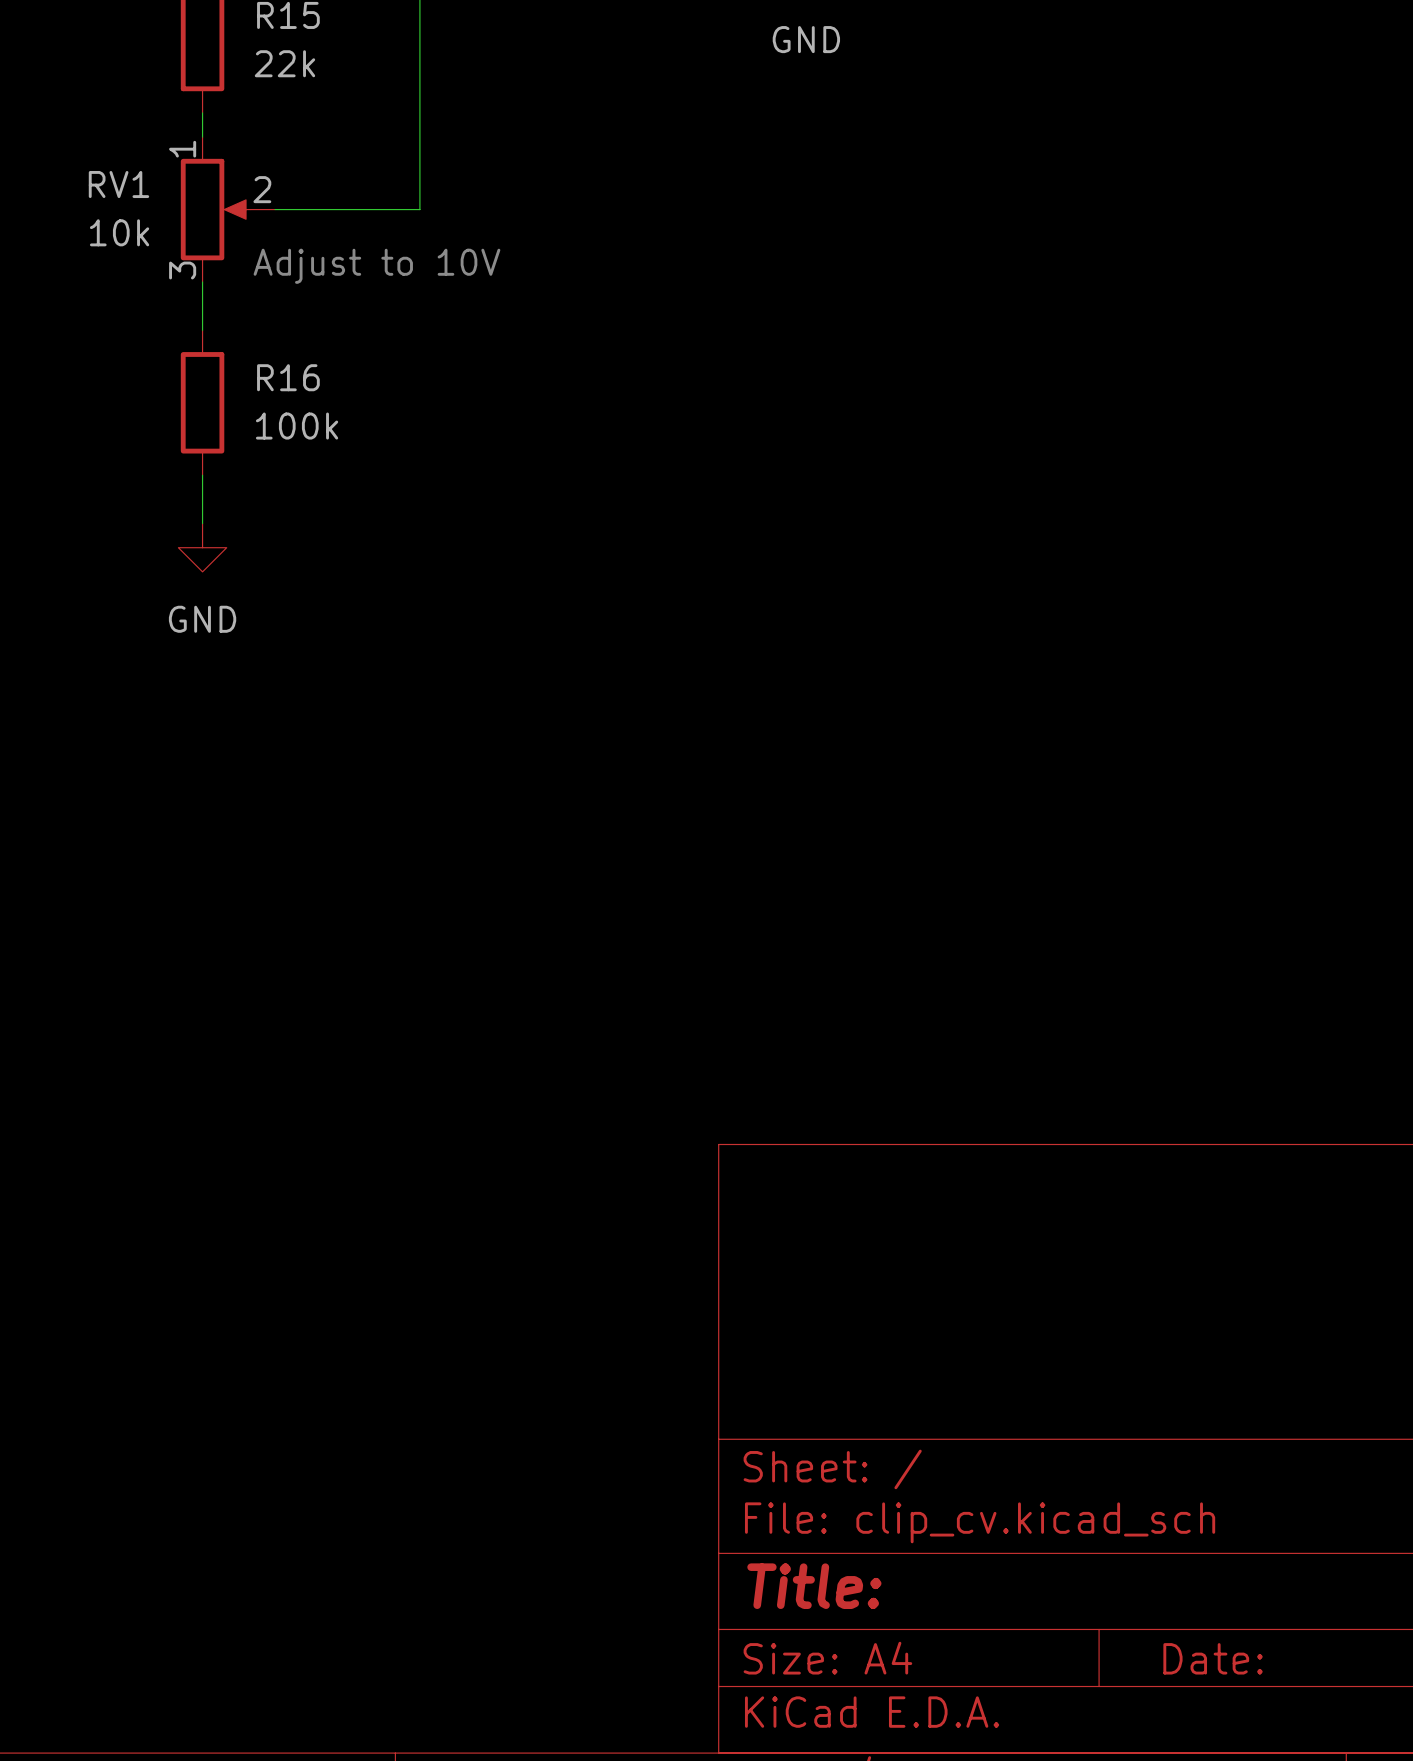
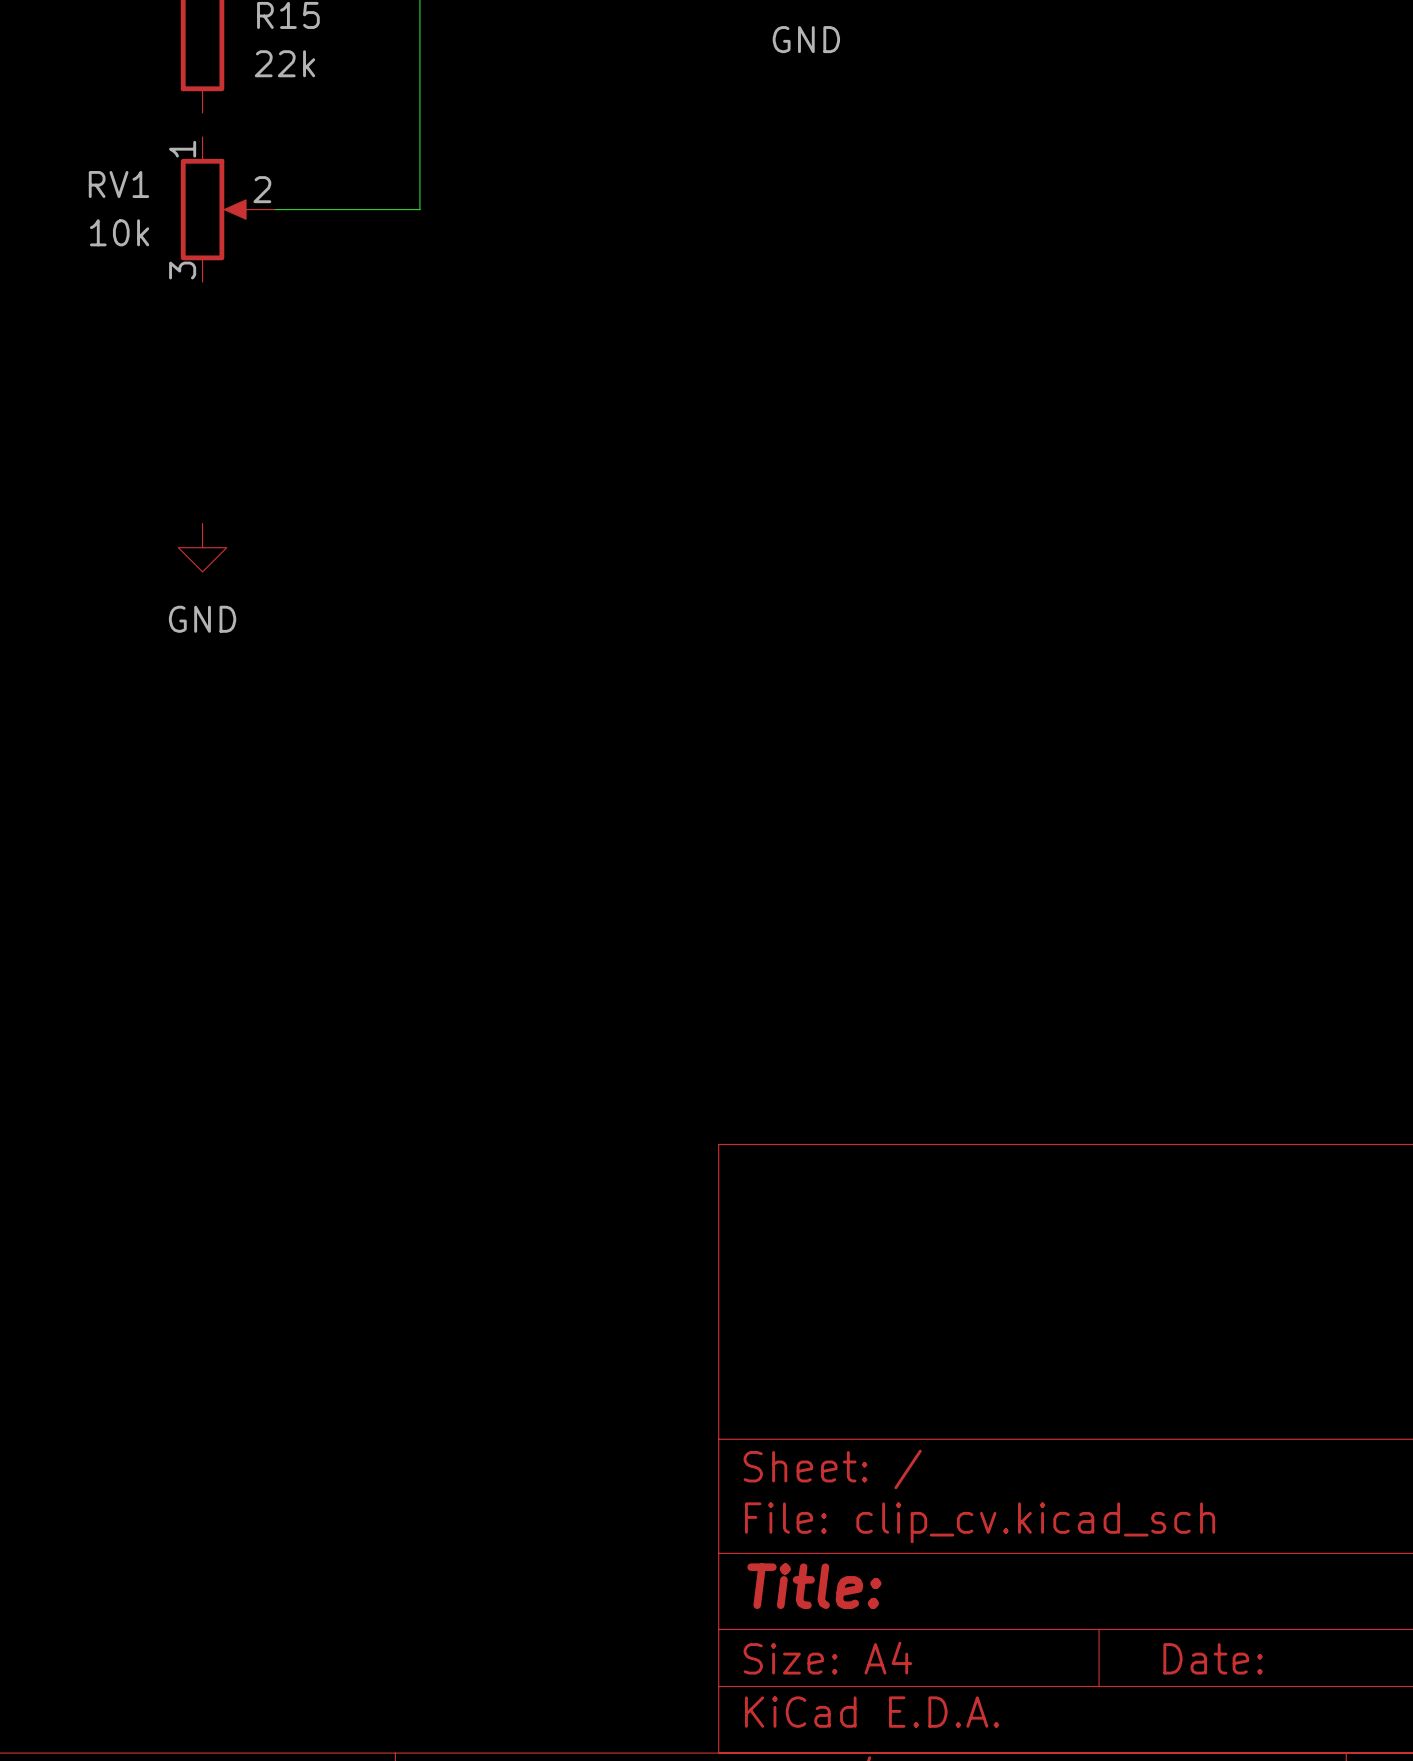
wire: (202, 112) (202, 137) -> none
text: Adjust to 10V (376, 266) -> none
wire: (202, 282) (202, 330) -> none
R16: 100k (202, 402) -> none
wire: (202, 475) (202, 523) -> none

